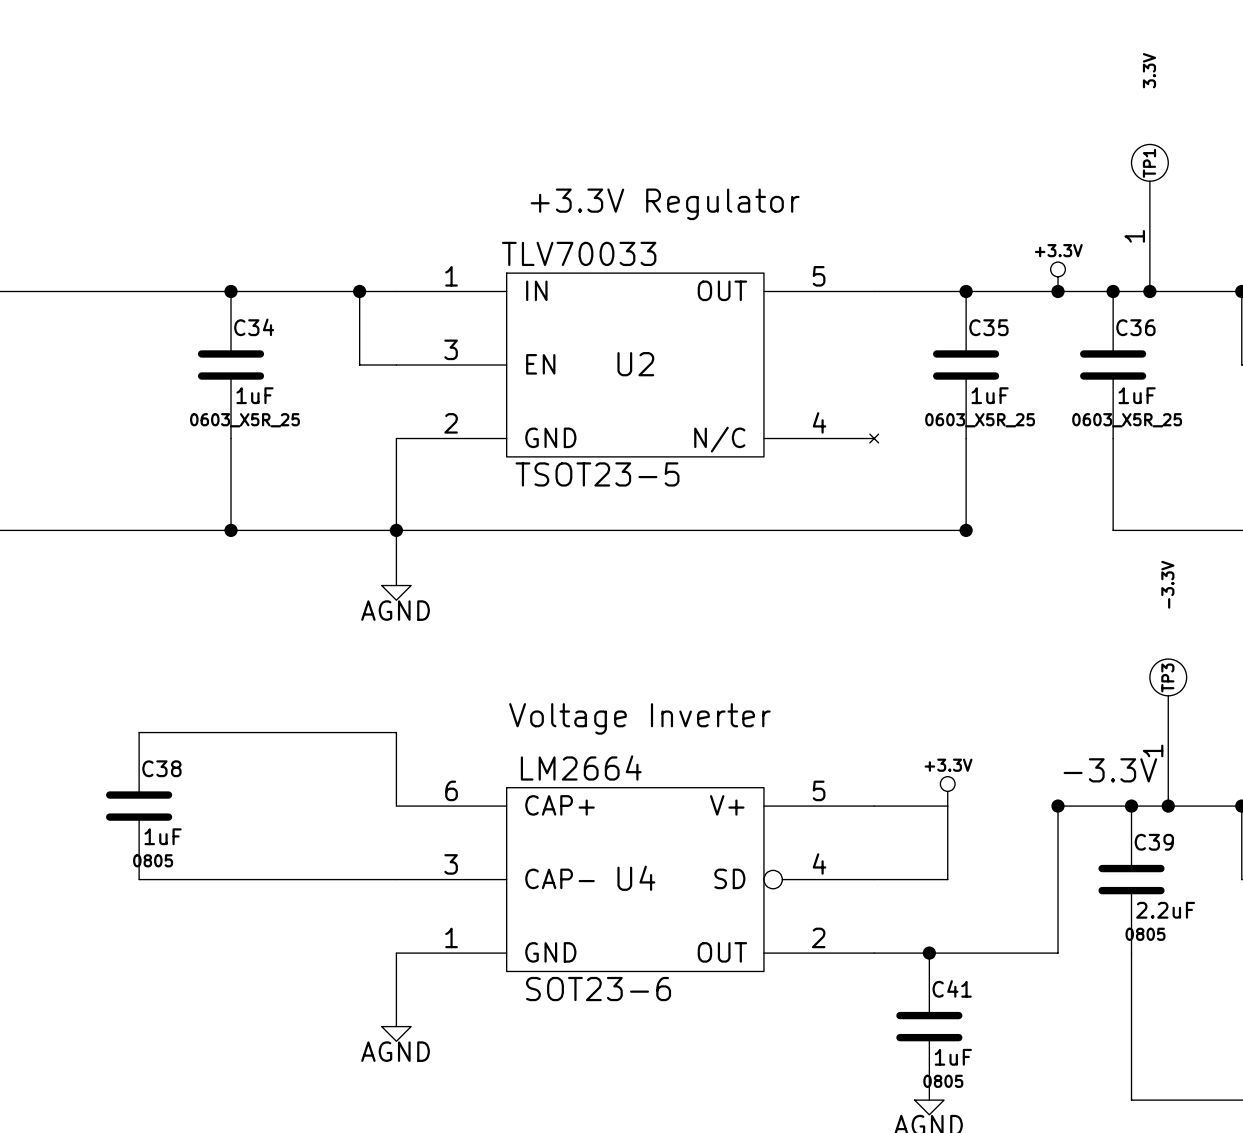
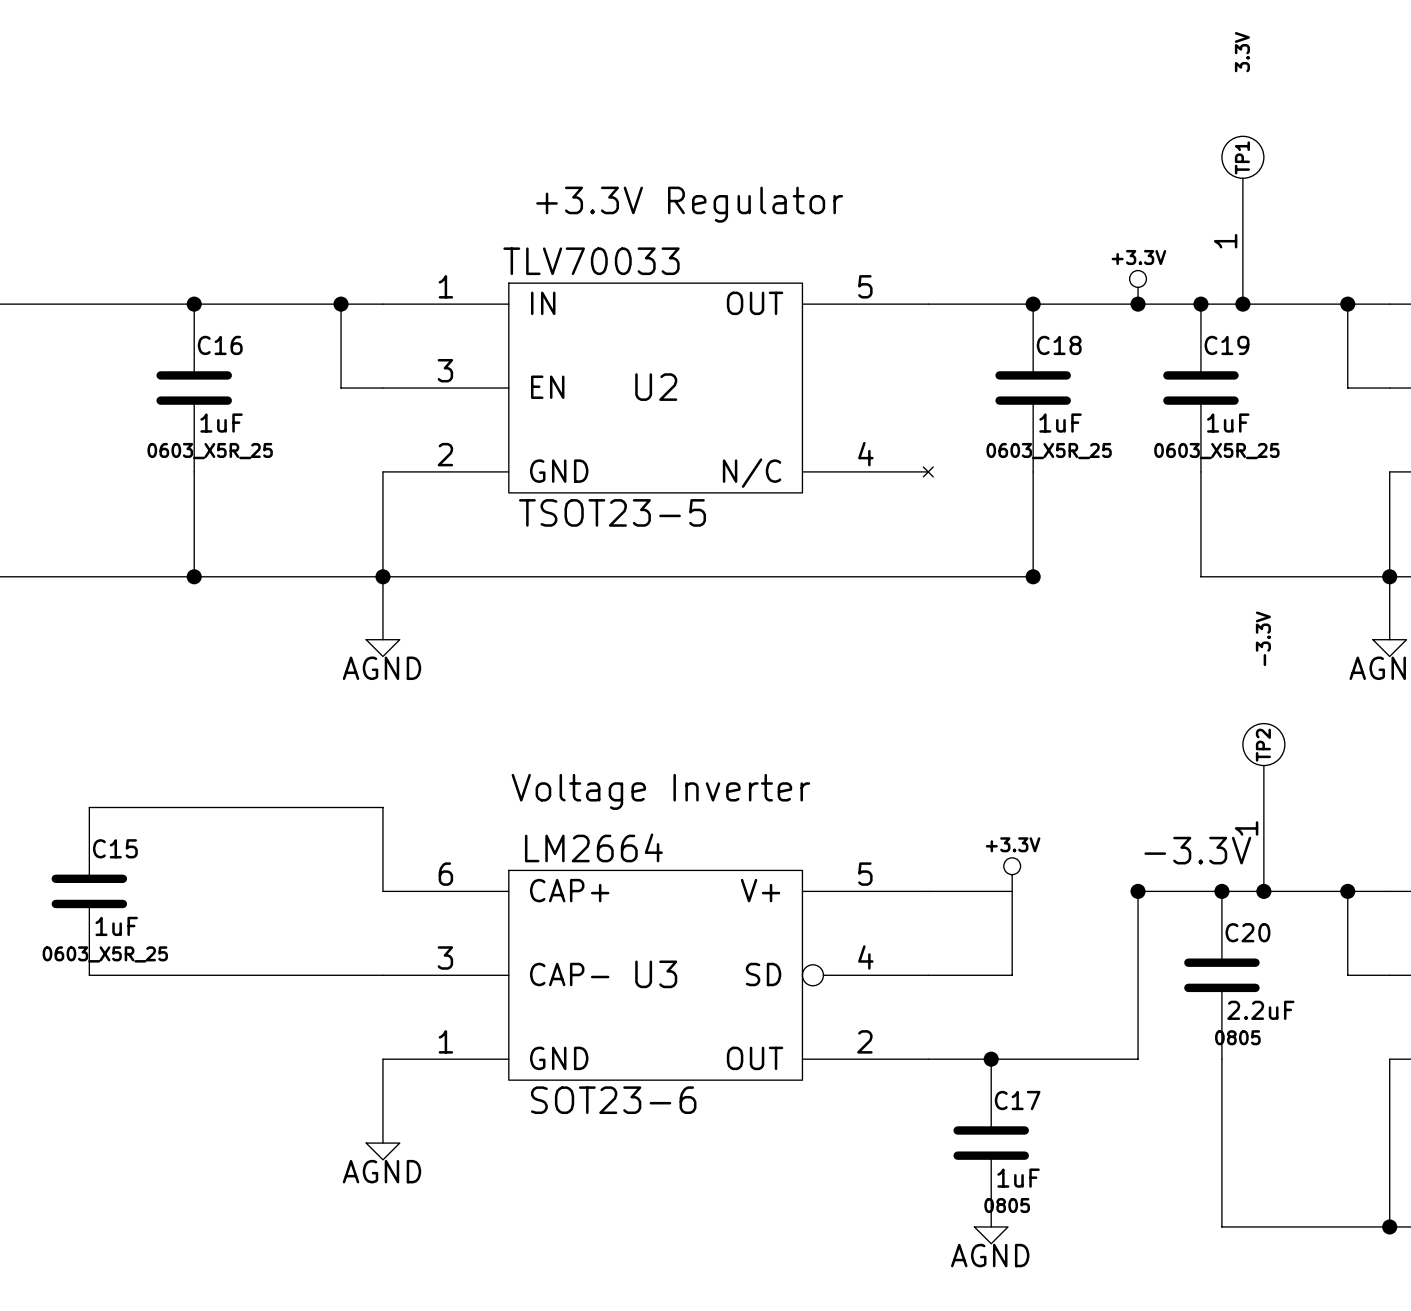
C34 name: C34 (254, 327) -> C16 (220, 345)
C35 name: C35 (988, 327) -> C18 (1059, 345)
C36 name: C36 (1135, 327) -> C19 (1226, 345)
TP3 name: TP3 (1167, 677) -> TP2 (1263, 745)
C38 name: C38 (161, 768) -> C15 (115, 848)
C39 name: C39 (1154, 842) -> C20 (1247, 932)
C38 text: 0805 (153, 860) -> 0603_X5R_25 (105, 954)
U4 name: U4 (636, 878) -> U3 (656, 974)
C41 name: C41 (952, 988) -> C17 (1017, 1100)

